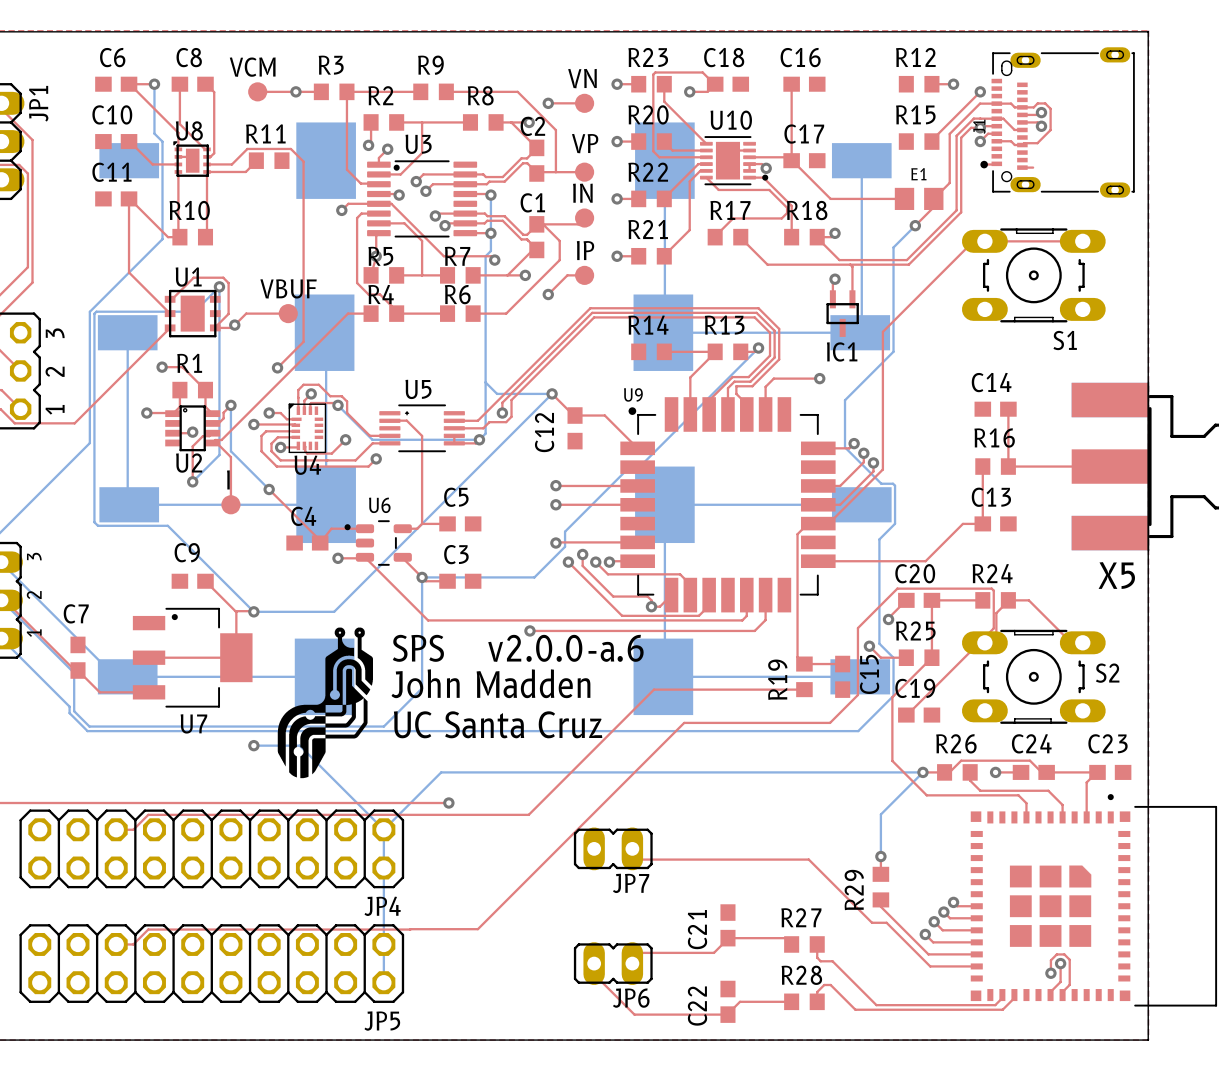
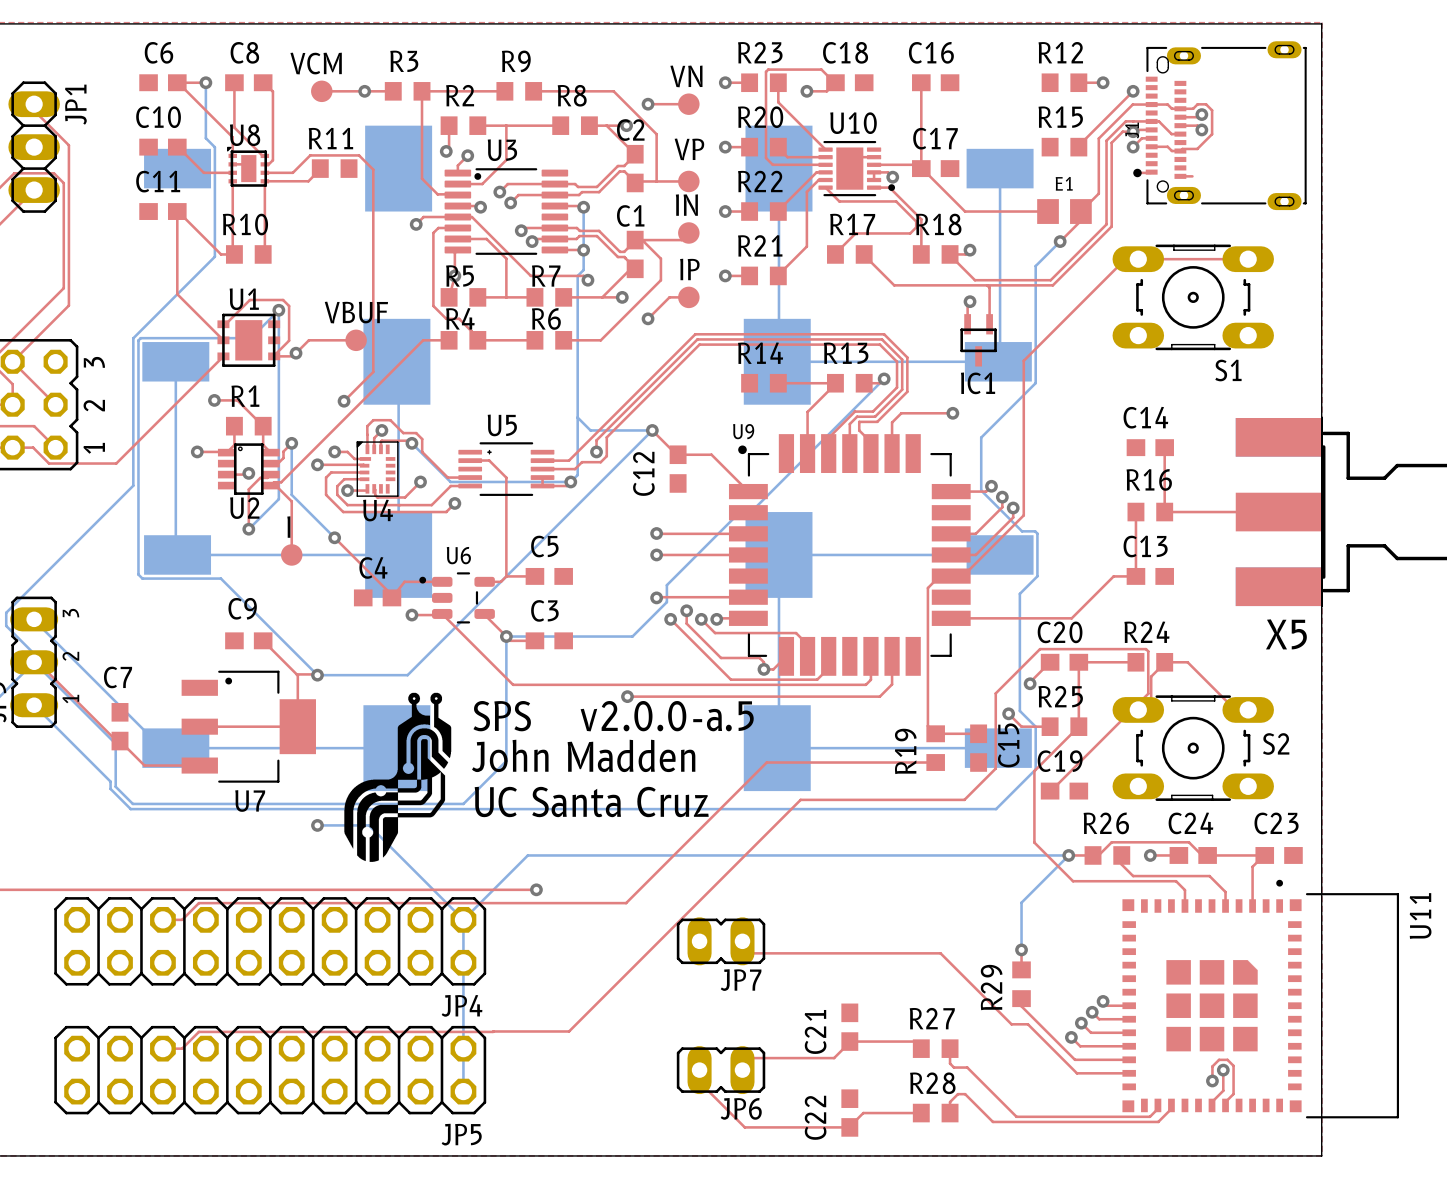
text: v2.0.0-a.6 (565, 648) -> v2.0.0-a.5 (667, 716)

